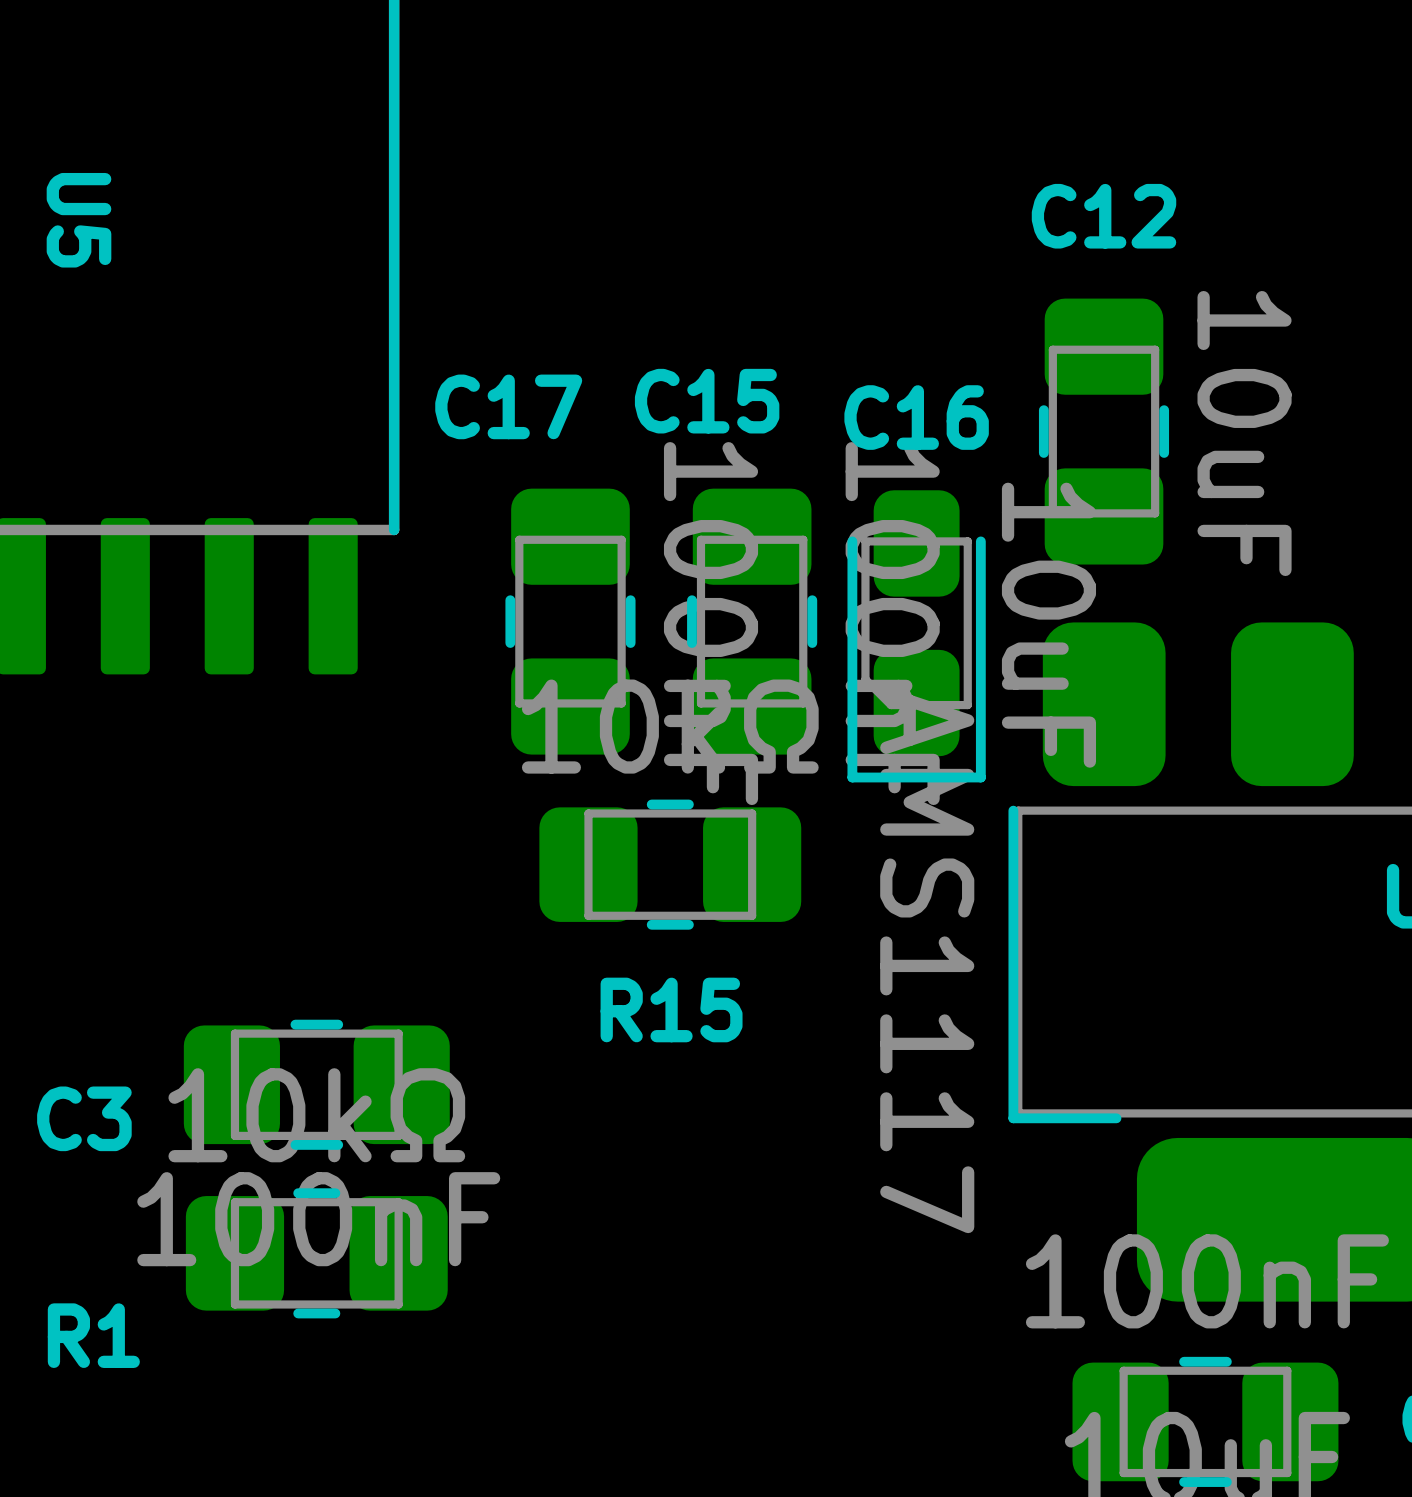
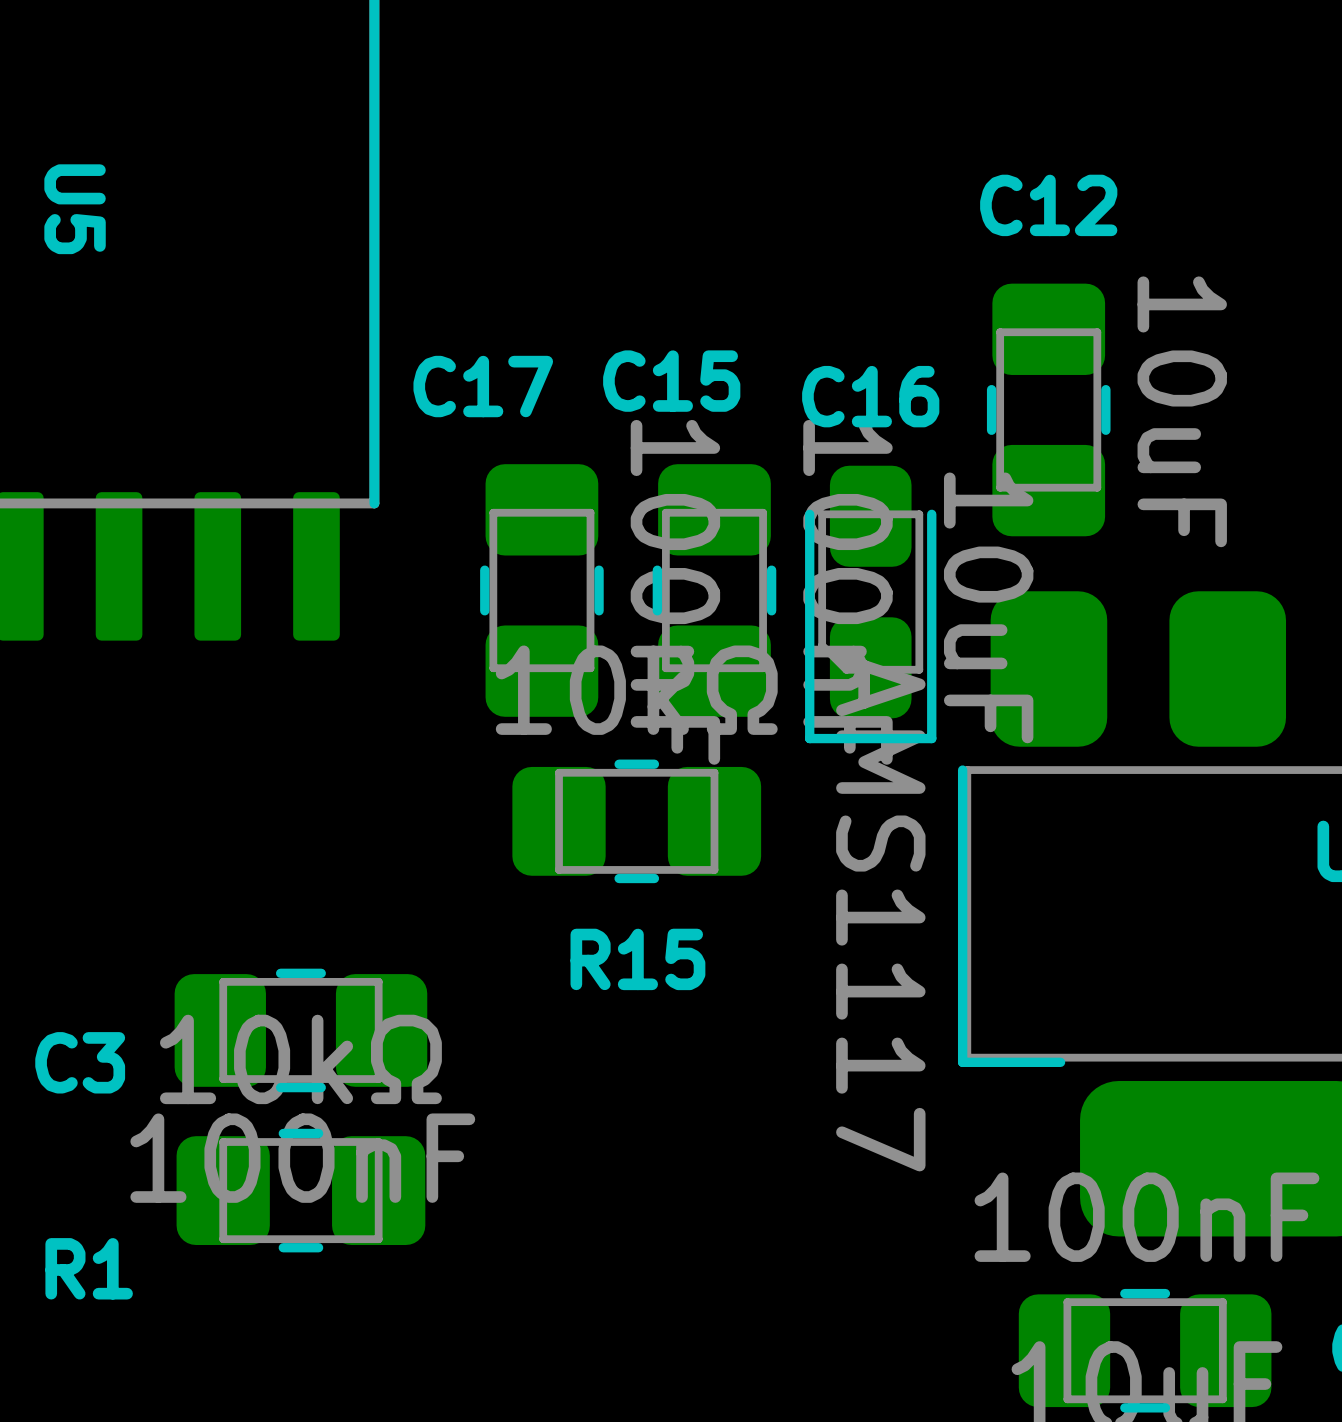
C16 value position: 10uF (1048, 625) -> 10uF (988, 607)

